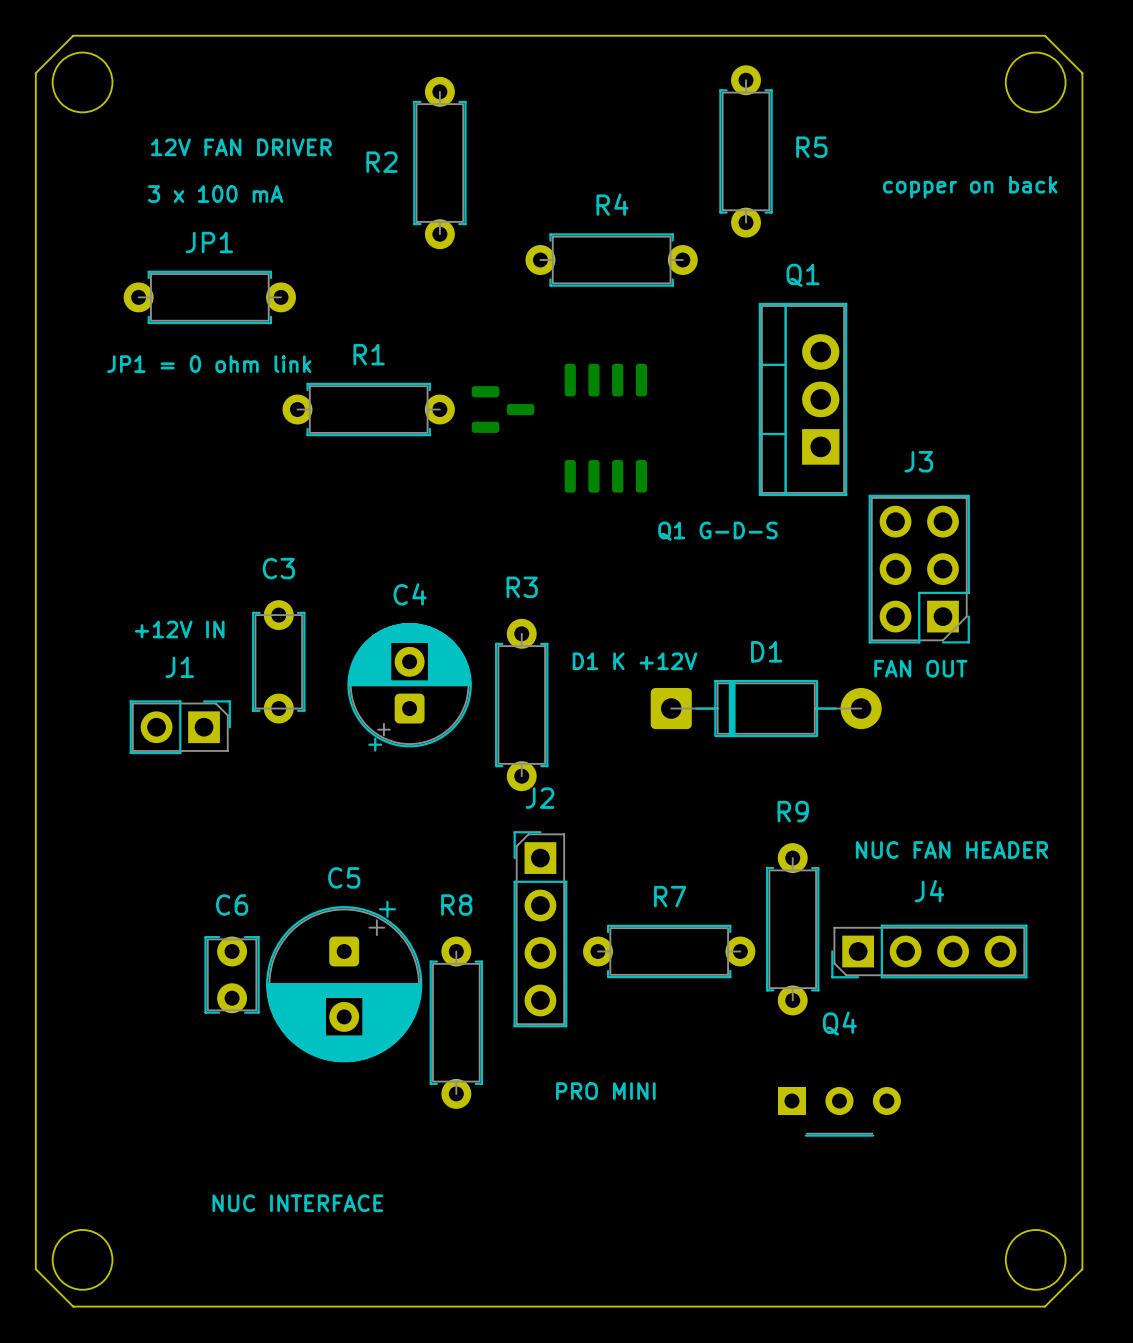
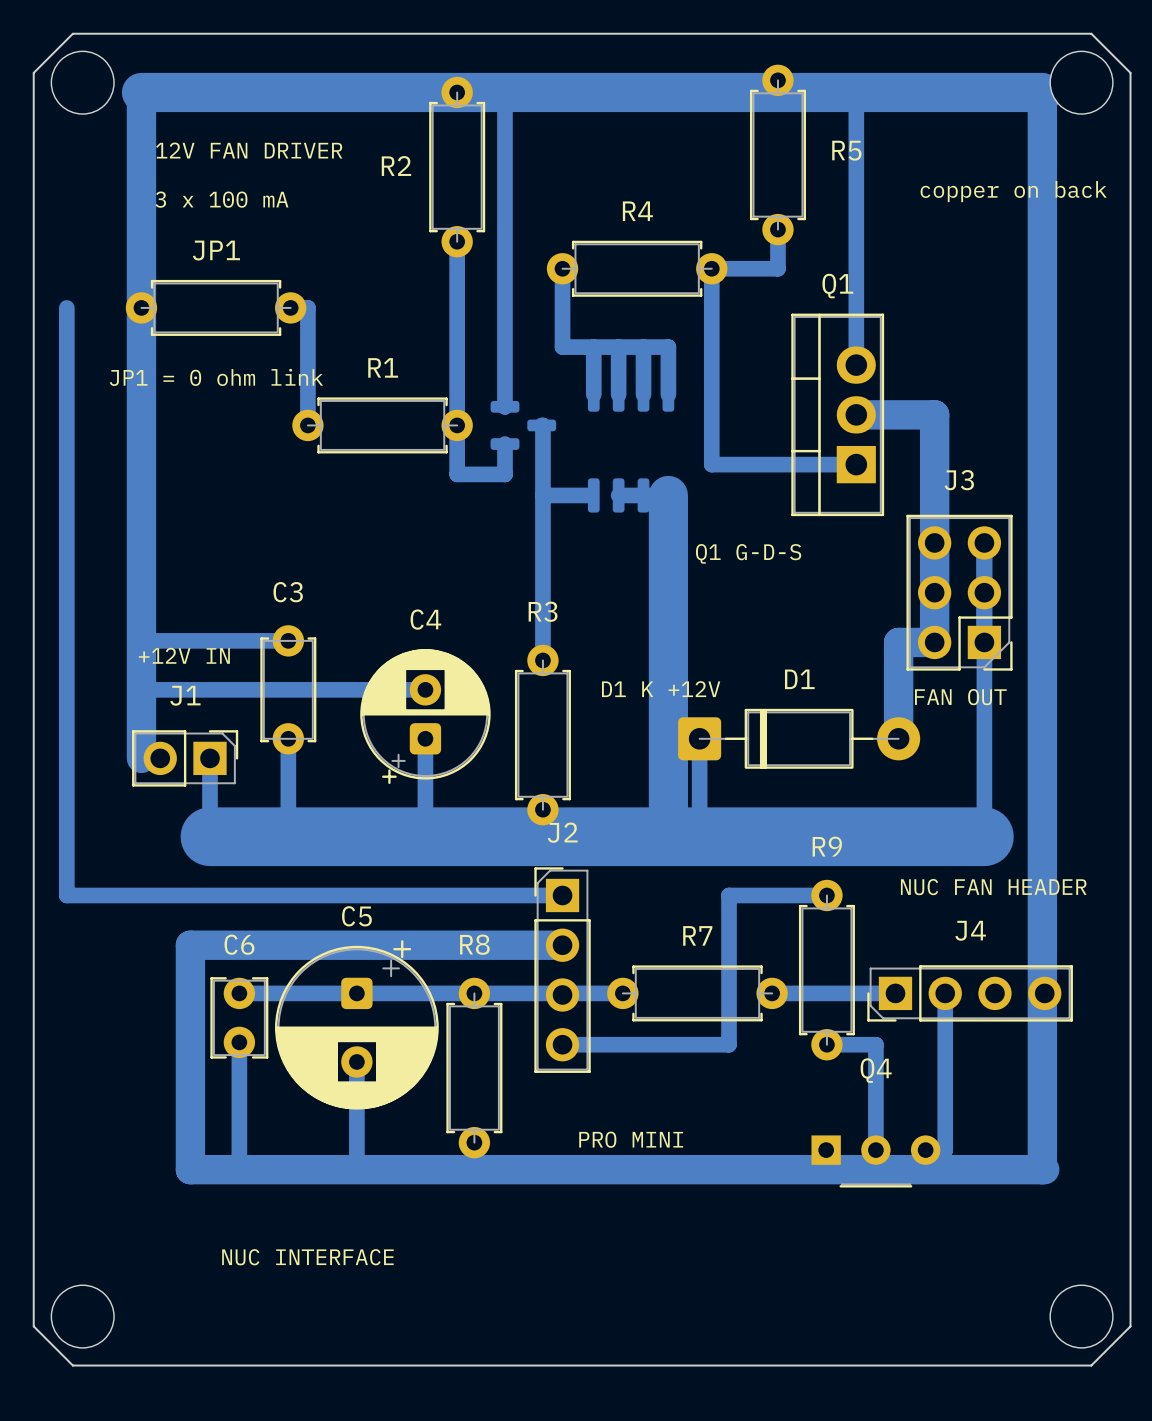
bottom track: none -> (504, 92) (504, 406)
bottom track: none -> (856, 92) (856, 365)
bottom track: none -> (777, 229) (777, 268) (711, 268) (711, 464) (856, 464)
bottom track: none -> (457, 241) (457, 474) (505, 474) (505, 444)
bottom track: none -> (562, 268) (562, 347) (668, 347) (668, 394)
bottom track: none -> (66, 307) (66, 895) (562, 895)
bottom track: none -> (290, 307) (307, 307) (307, 425)
bottom track: none -> (593, 347) (593, 394)
bottom track: none -> (618, 347) (618, 394)
bottom track: none -> (643, 347) (643, 394)
bottom track: none -> (856, 414) (934, 414) (934, 642) (898, 642) (898, 738)
bottom track: none -> (541, 425) (542, 660)
bottom track: none -> (542, 495) (589, 495)
bottom track: none -> (618, 495) (668, 495) (668, 836)
bottom track: none -> (984, 542) (984, 836) (210, 836) (210, 758)
bottom track: none -> (141, 640) (288, 640)
bottom track: none -> (141, 689) (425, 689)
bottom track: none -> (288, 738) (288, 836)
bottom track: none -> (425, 738) (425, 836)
bottom track: none -> (699, 738) (699, 836)
bottom track: none -> (160, 758) (141, 758) (141, 92) (1042, 92) (1042, 1169)
bottom track: none -> (826, 895) (729, 895) (729, 1044) (562, 1044)
bottom track: none -> (562, 945) (190, 945) (190, 1169) (1044, 1169) (1044, 993)
bottom track: none -> (239, 993) (622, 993)
bottom track: none -> (772, 993) (895, 993)
bottom track: none -> (945, 993) (945, 1150) (925, 1150)
bottom track: none -> (239, 1042) (239, 1169)
bottom track: none -> (826, 1044) (875, 1044) (875, 1150)
bottom track: none -> (356, 1061) (356, 1169)

